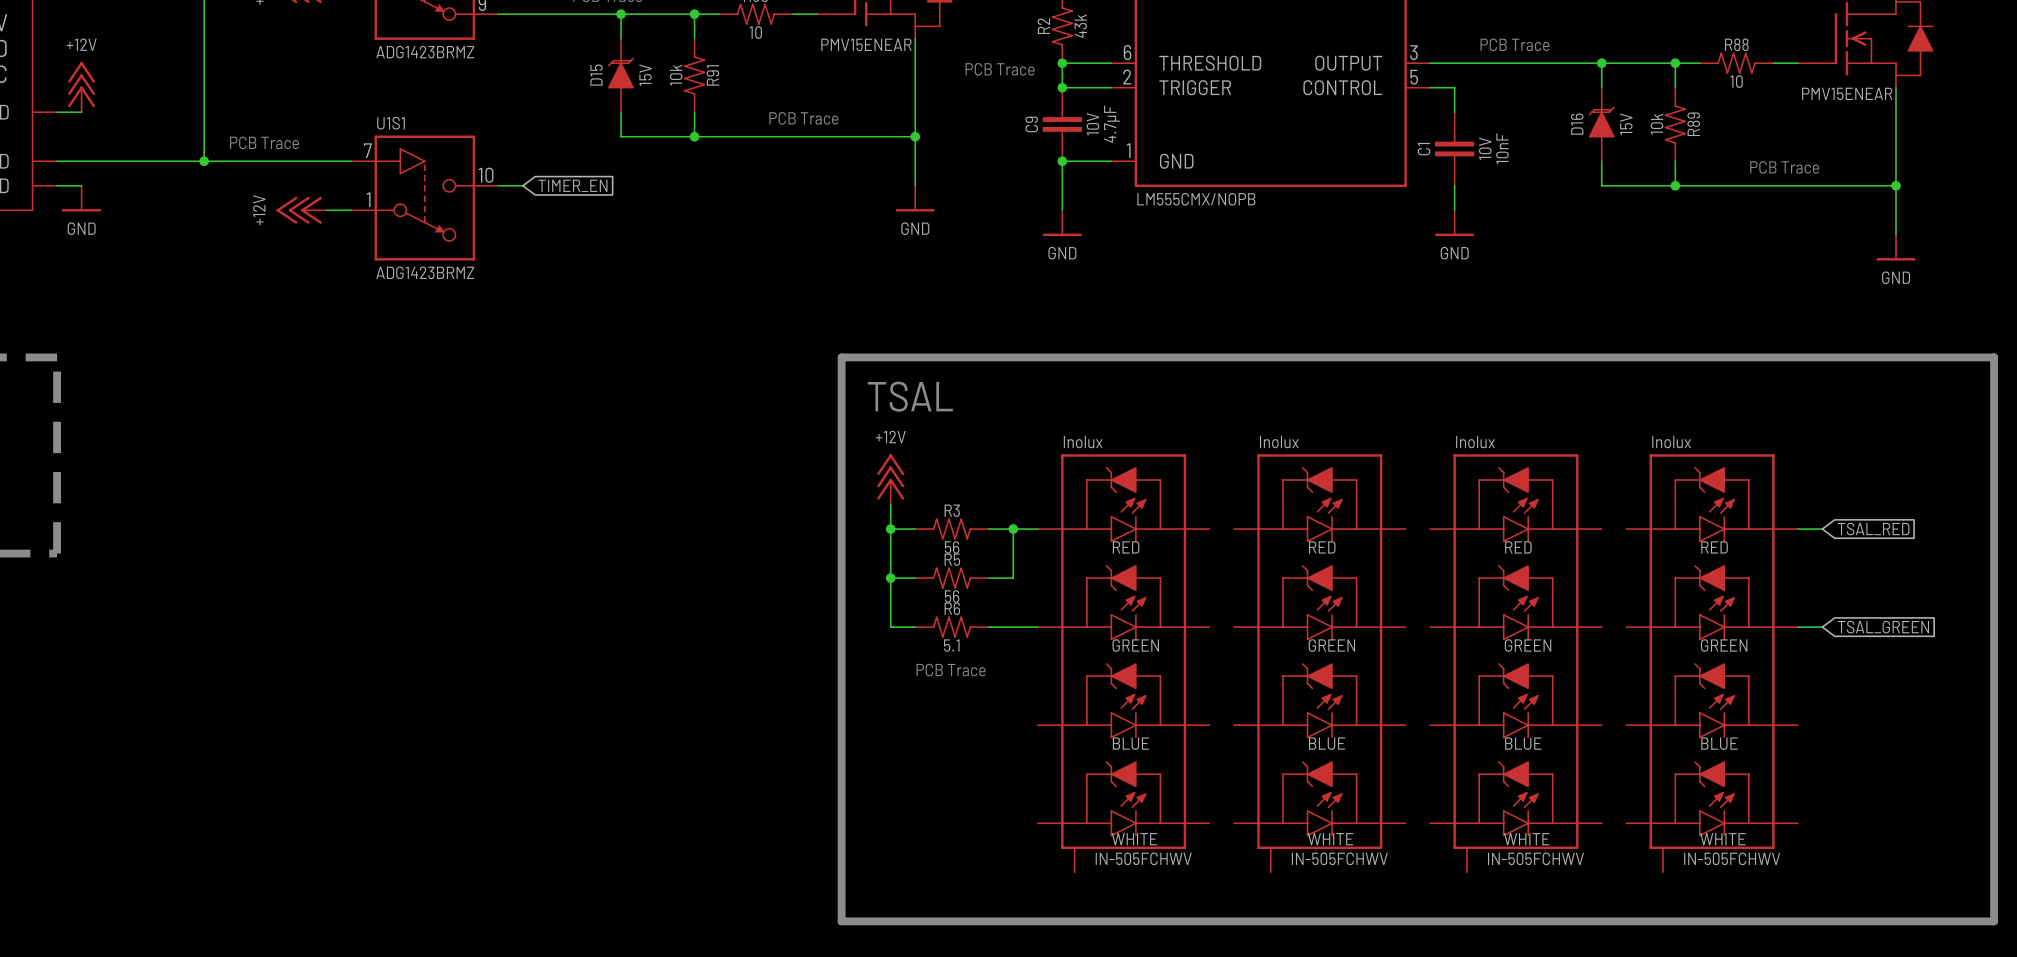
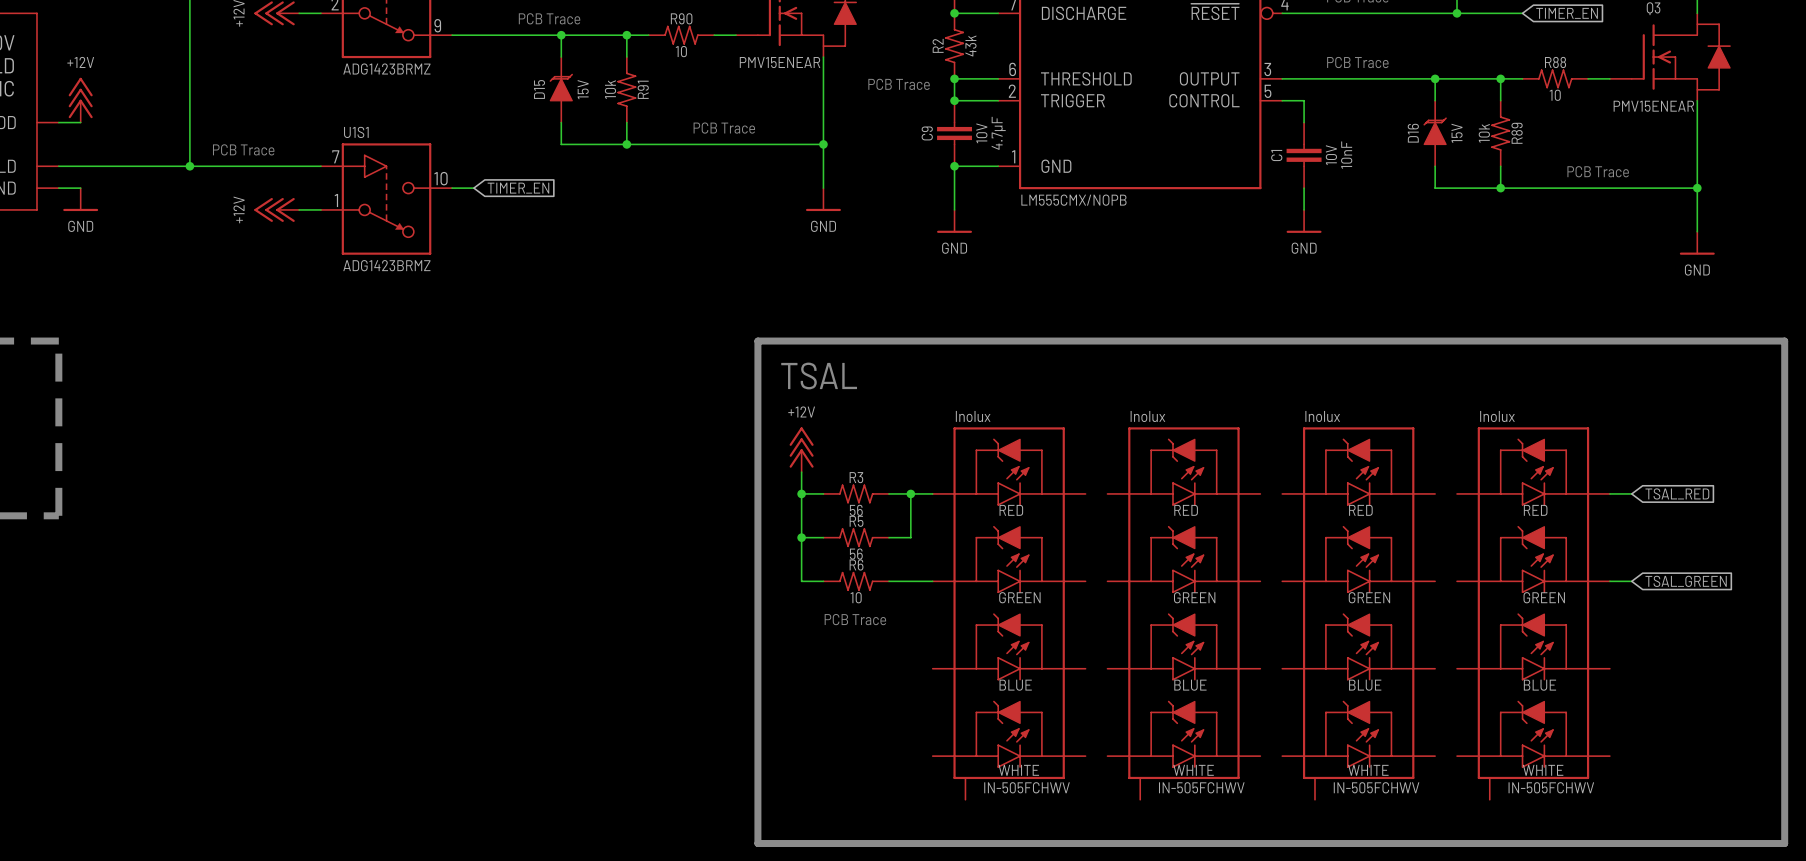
R6 value: 5.1 (951, 645) -> 10 (856, 597)

